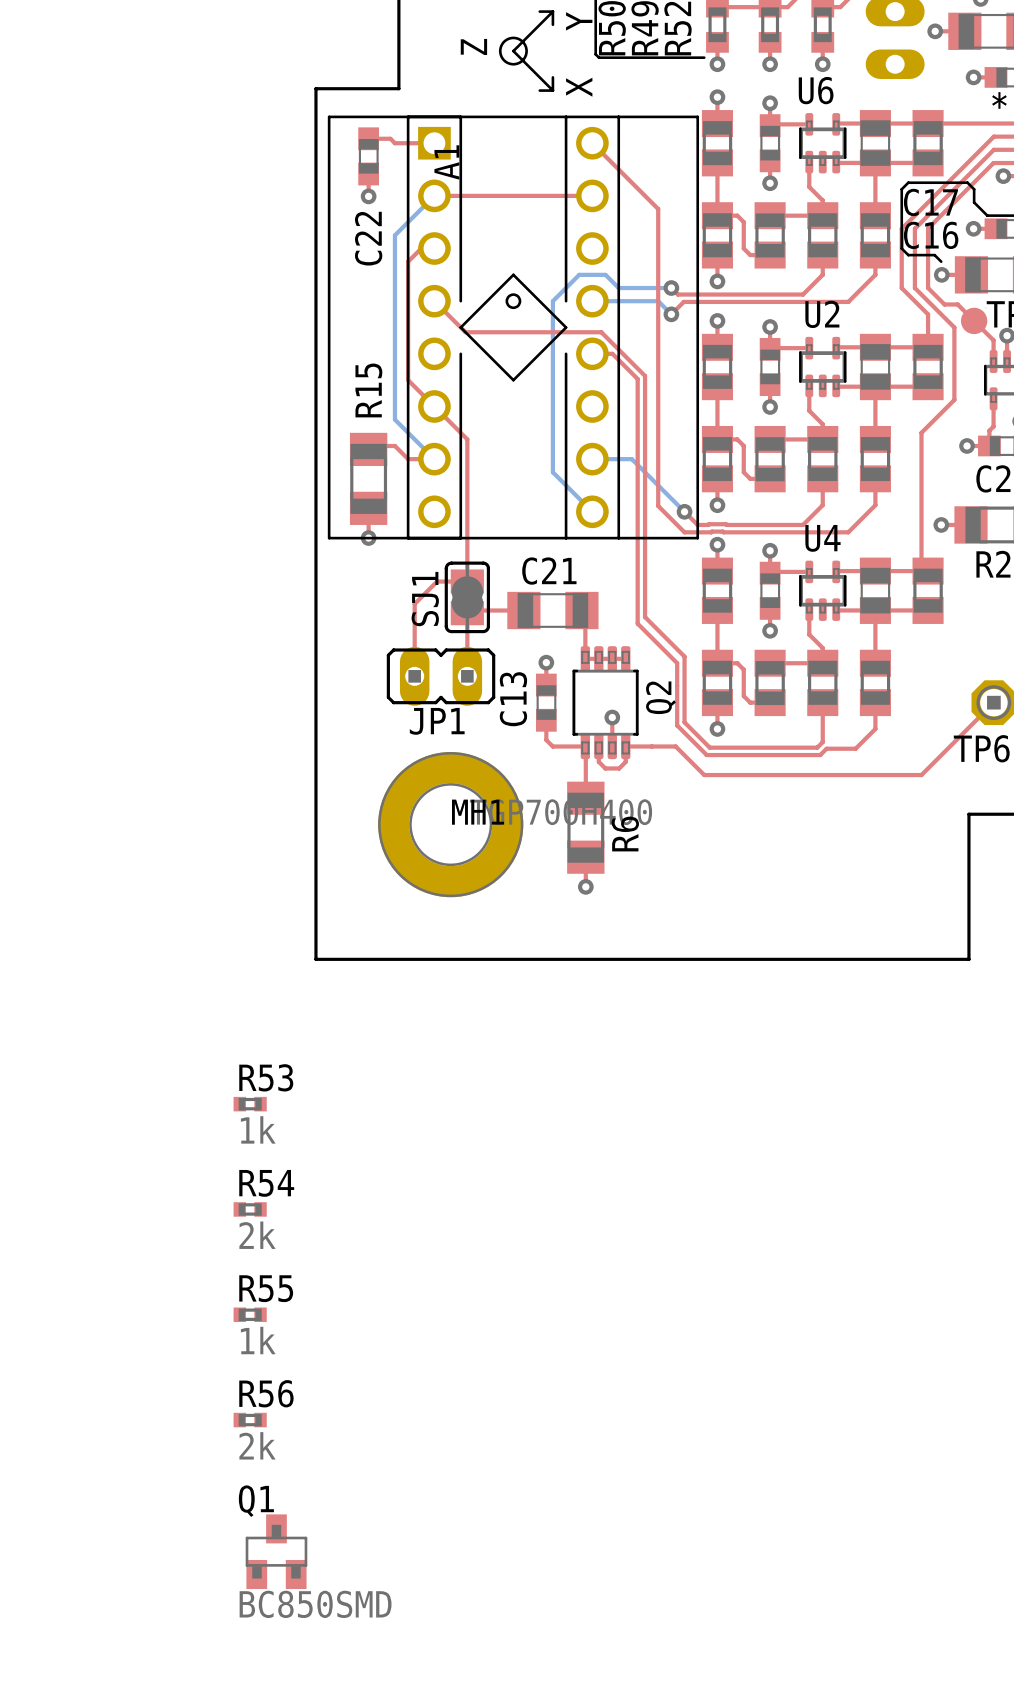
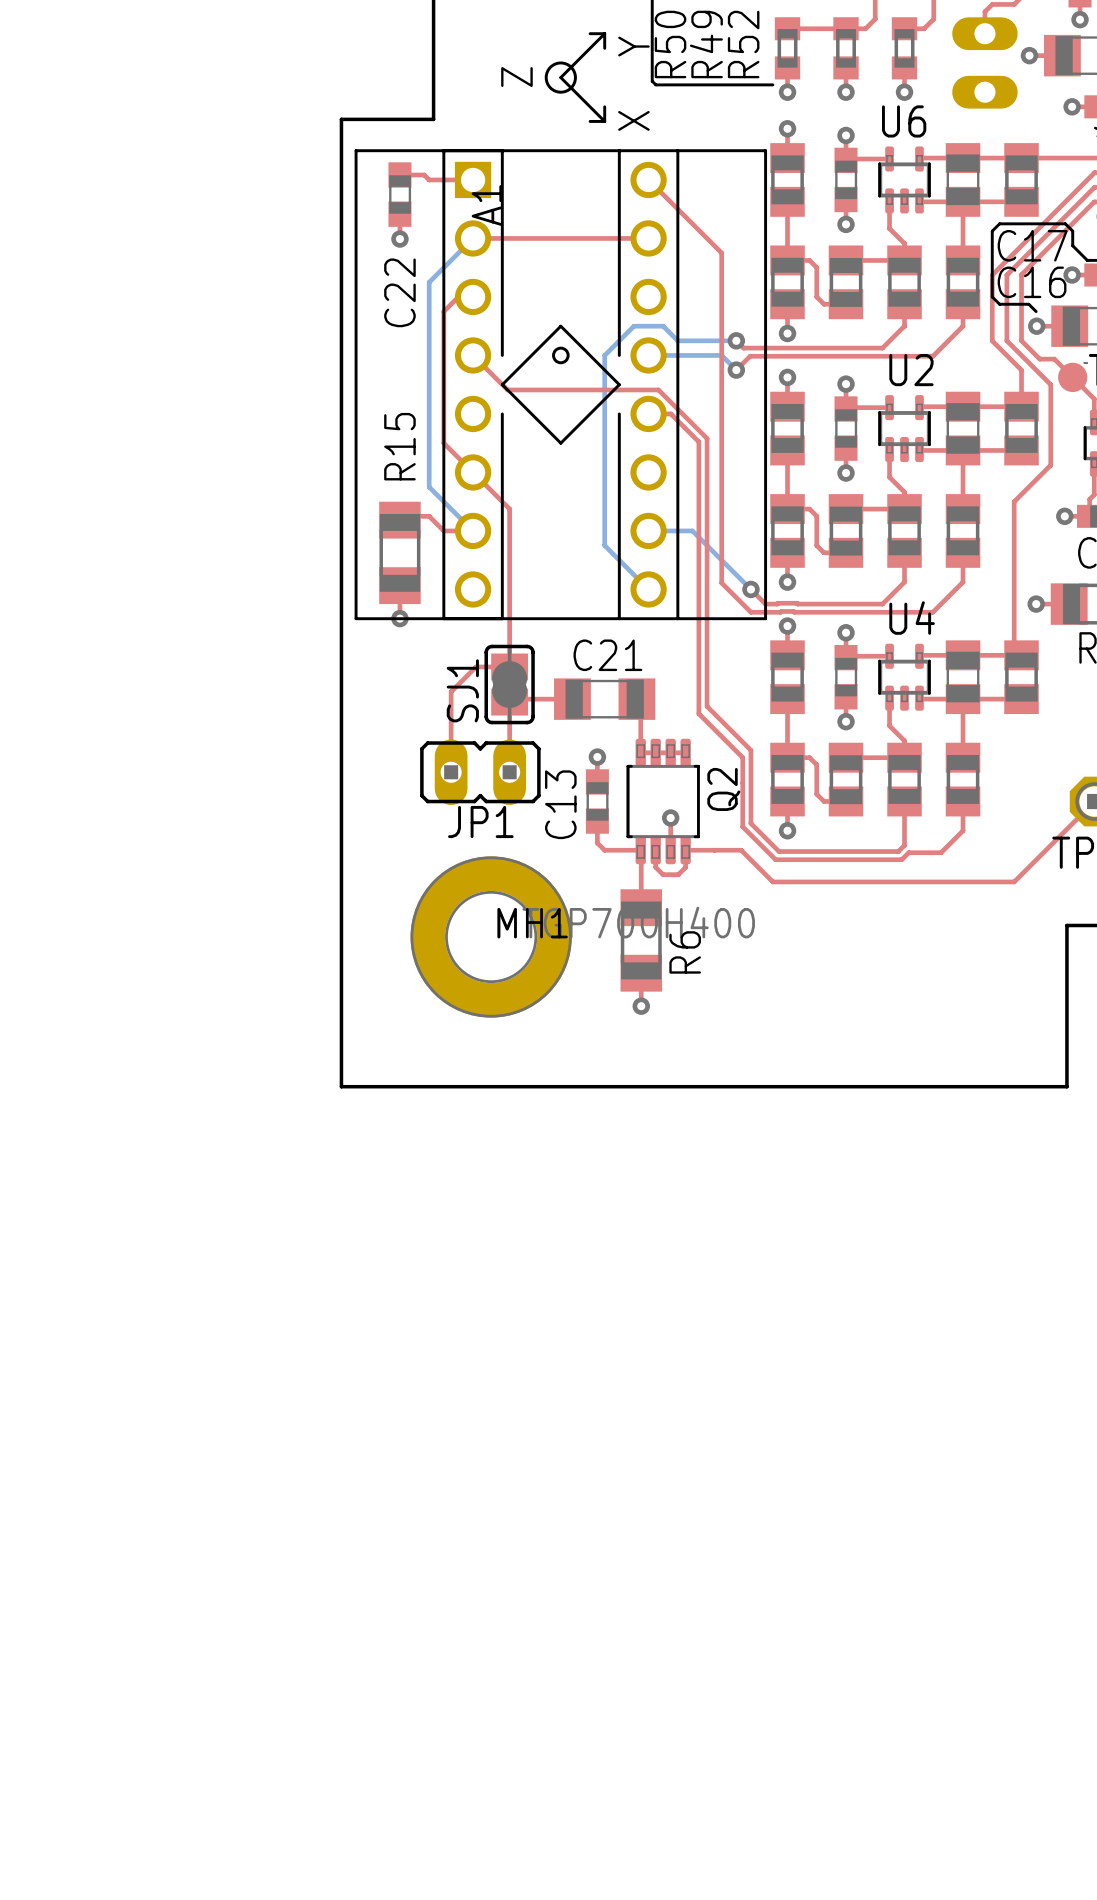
R53: 1k (250, 1104) -> none
R54: 2k (250, 1209) -> none
R55: 1k (250, 1314) -> none
R56: 2k (250, 1420) -> none
Q1: BC850SMD (276, 1551) -> none

